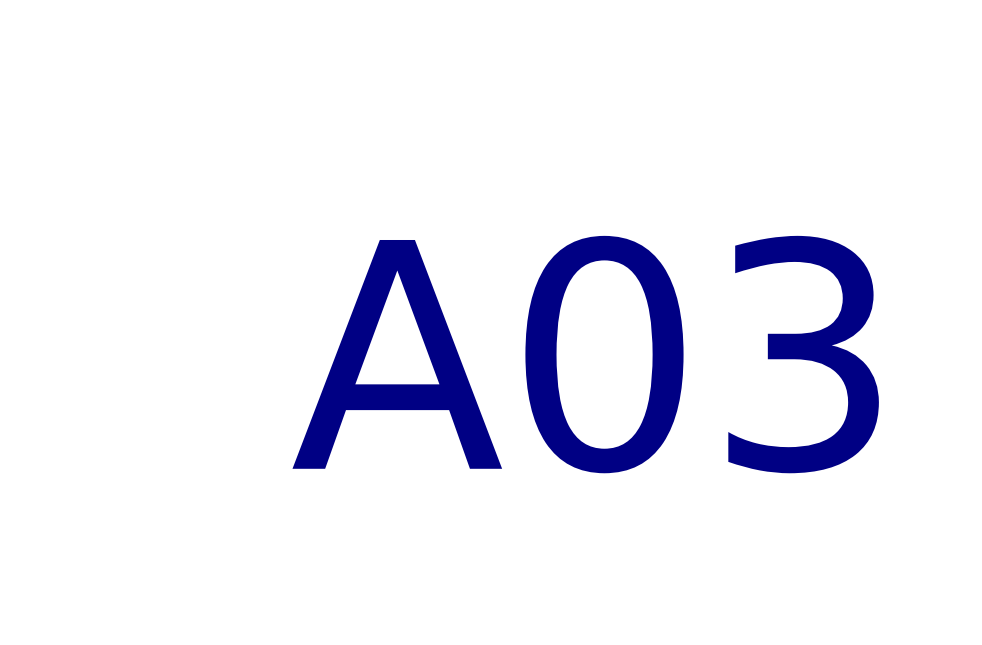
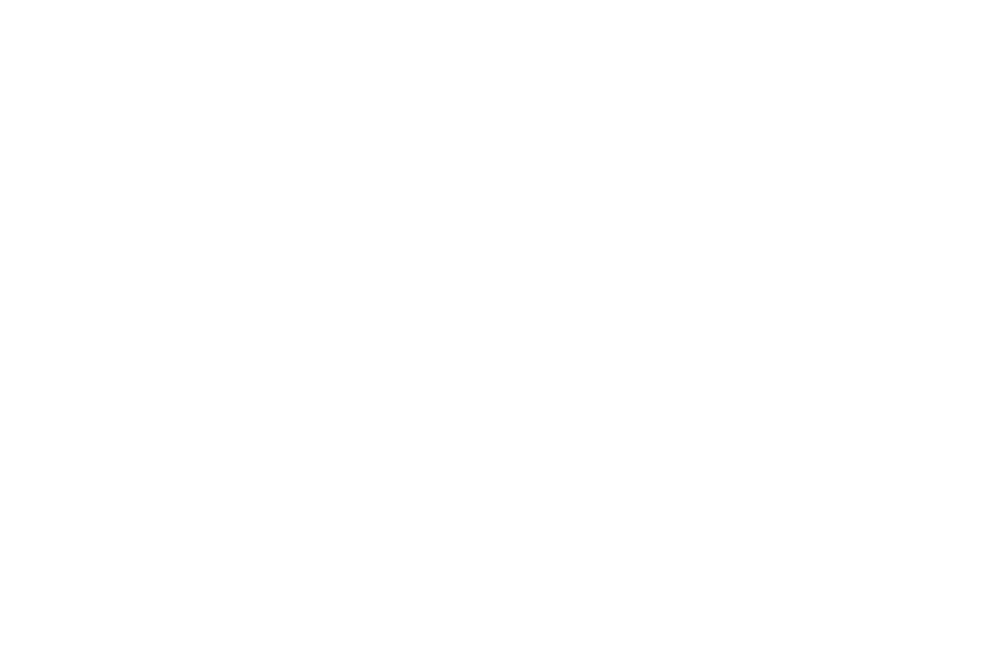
text: A03 (585, 354) -> none

